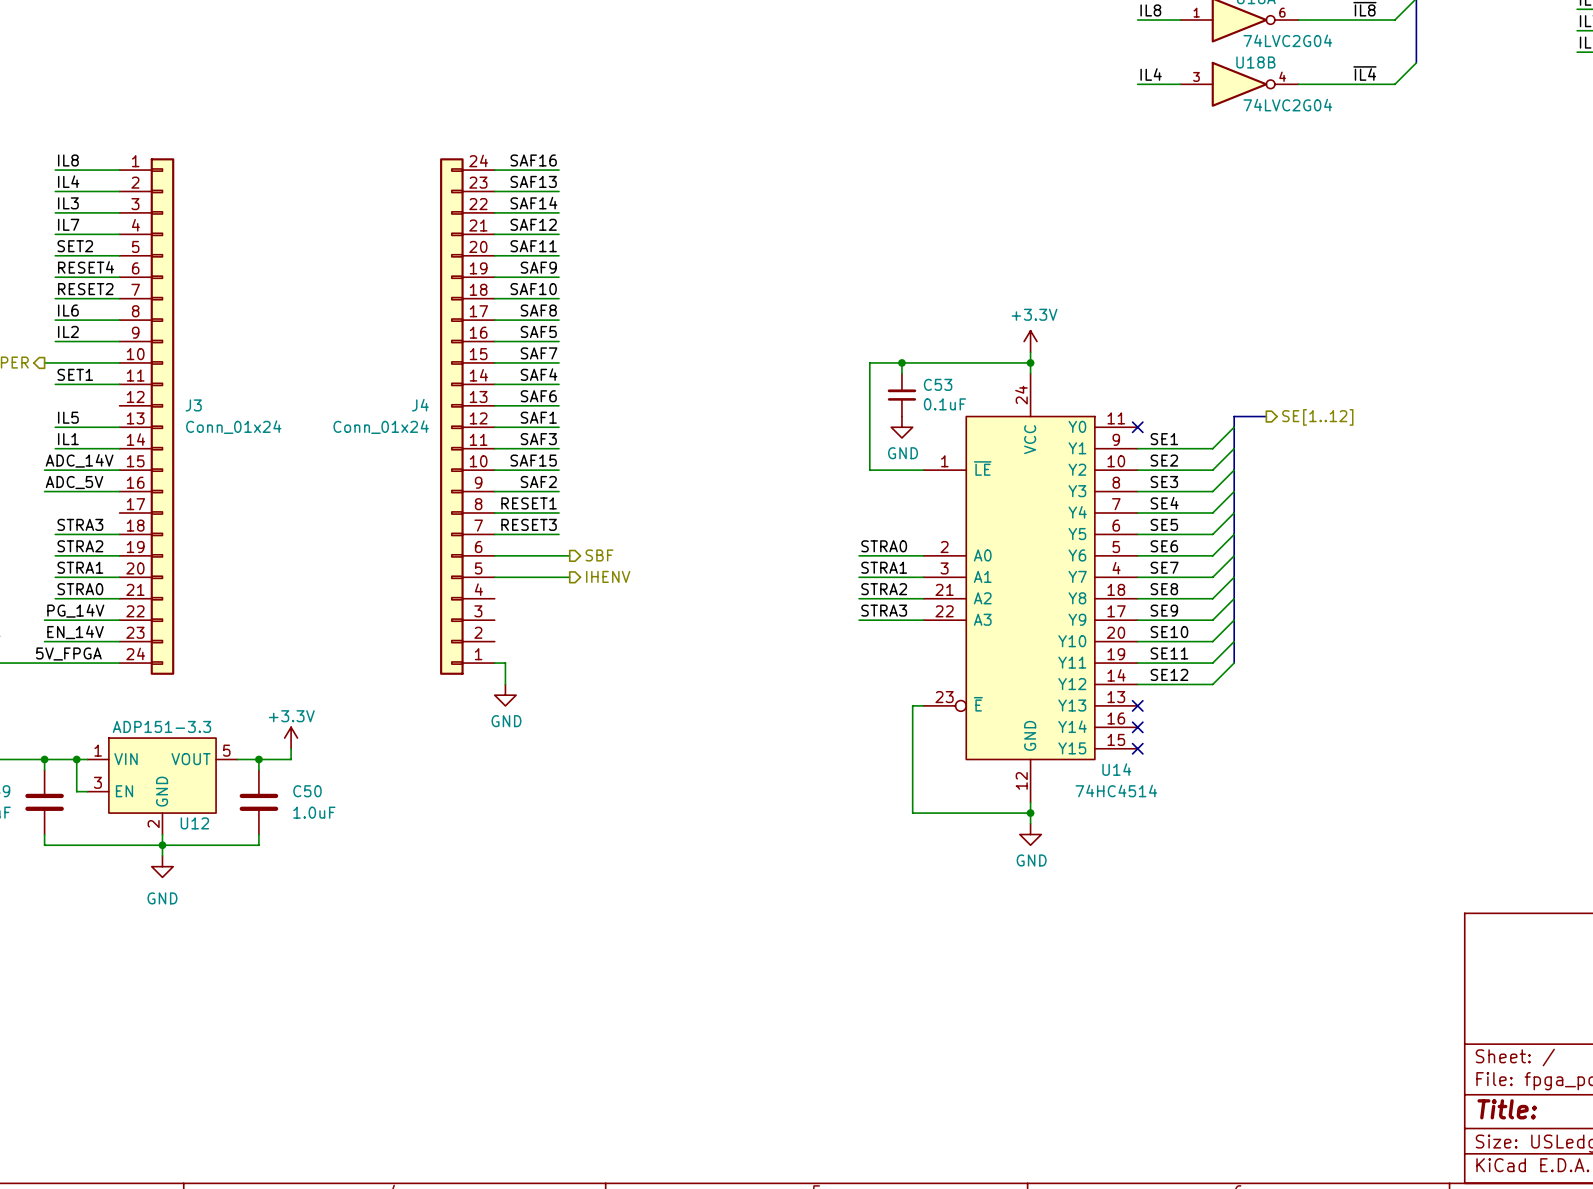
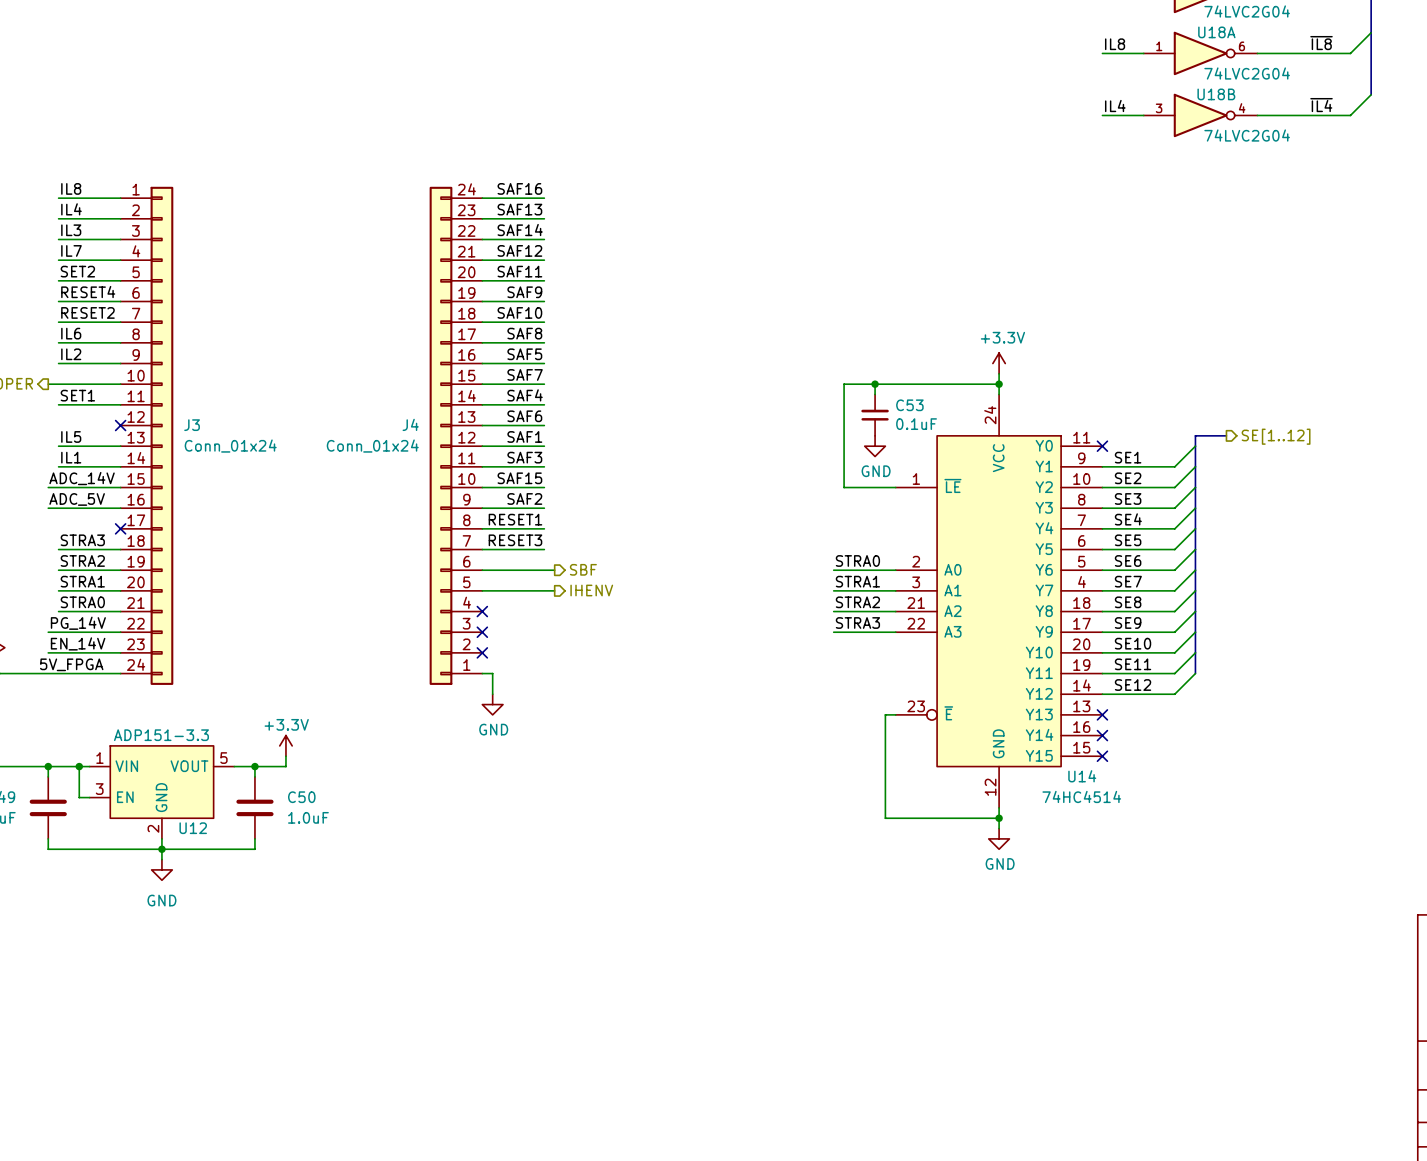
no-connect mark: none -> (120, 425)
no-connect mark: none -> (120, 528)
no-connect mark: none -> (482, 611)
no-connect mark: none -> (482, 632)
no-connect mark: none -> (482, 652)

